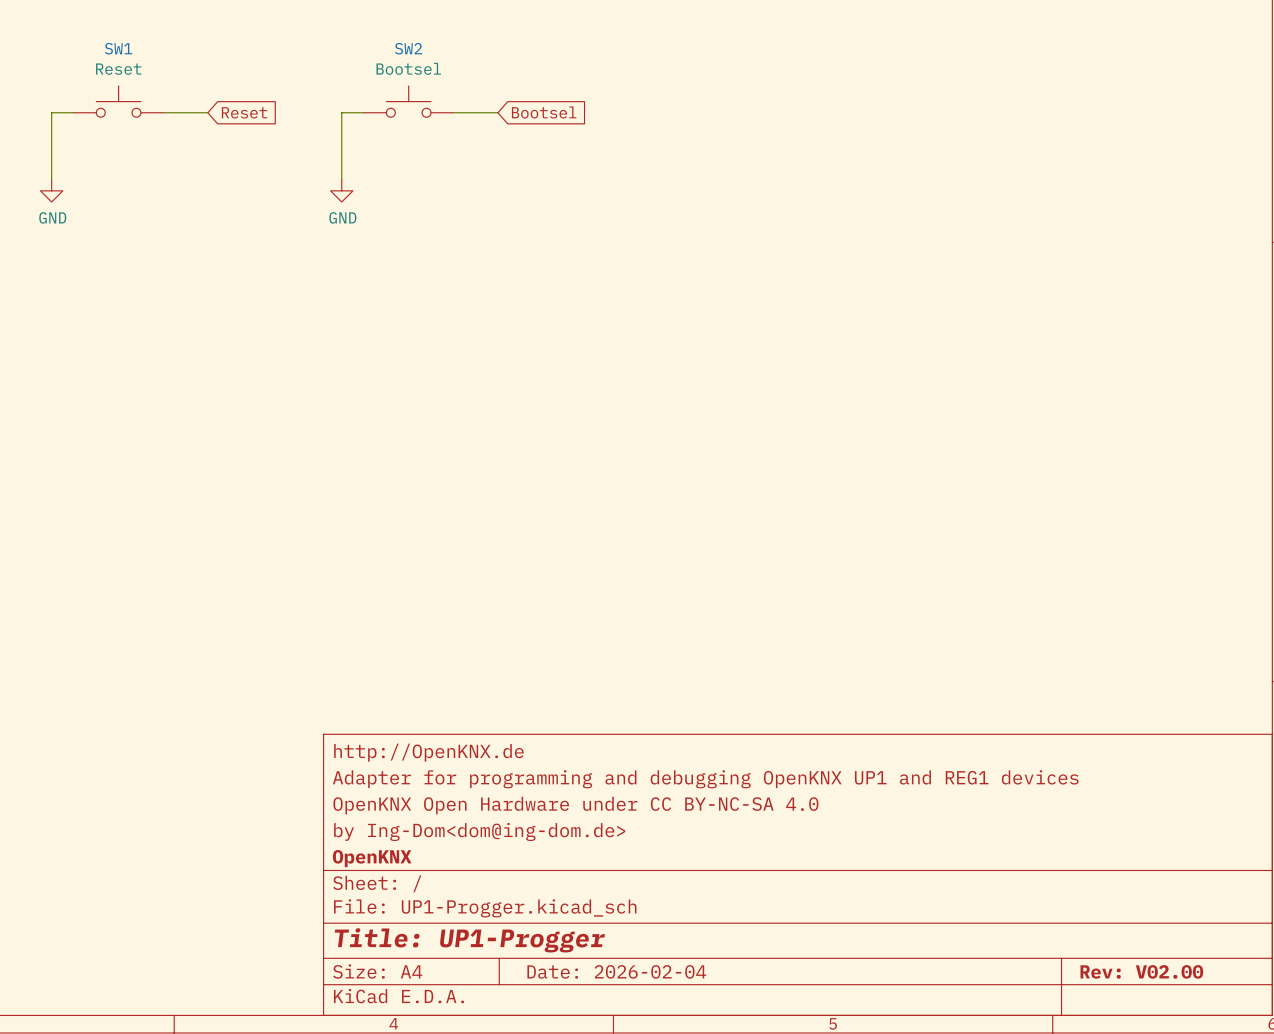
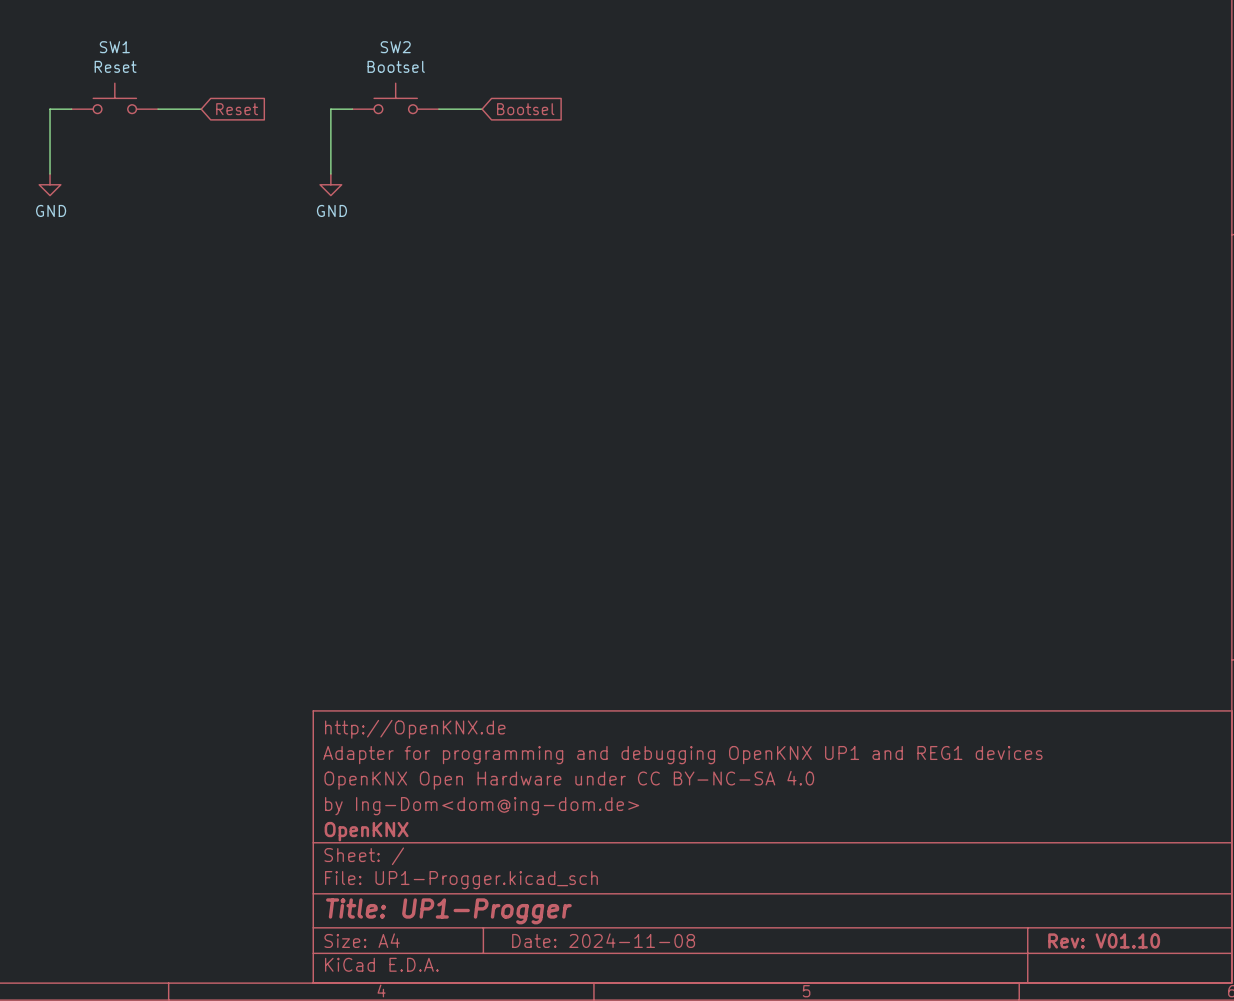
title block: Date: 2026-02-04 (616, 971) -> Date: 2024-11-08 (603, 940)
title block: Rev: V02.00 (1141, 971) -> Rev: V01.10 (1104, 940)

